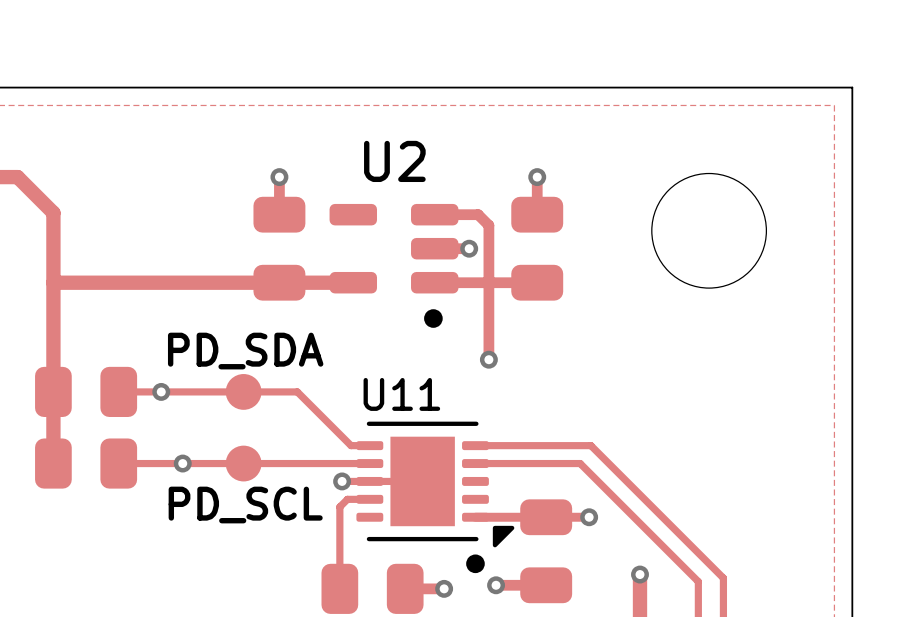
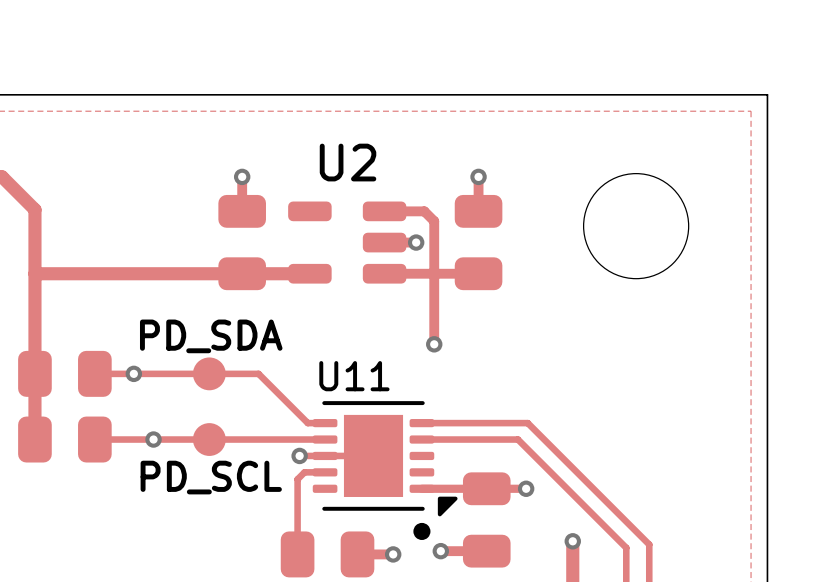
drawing: [424, 309, 443, 328] -> none

